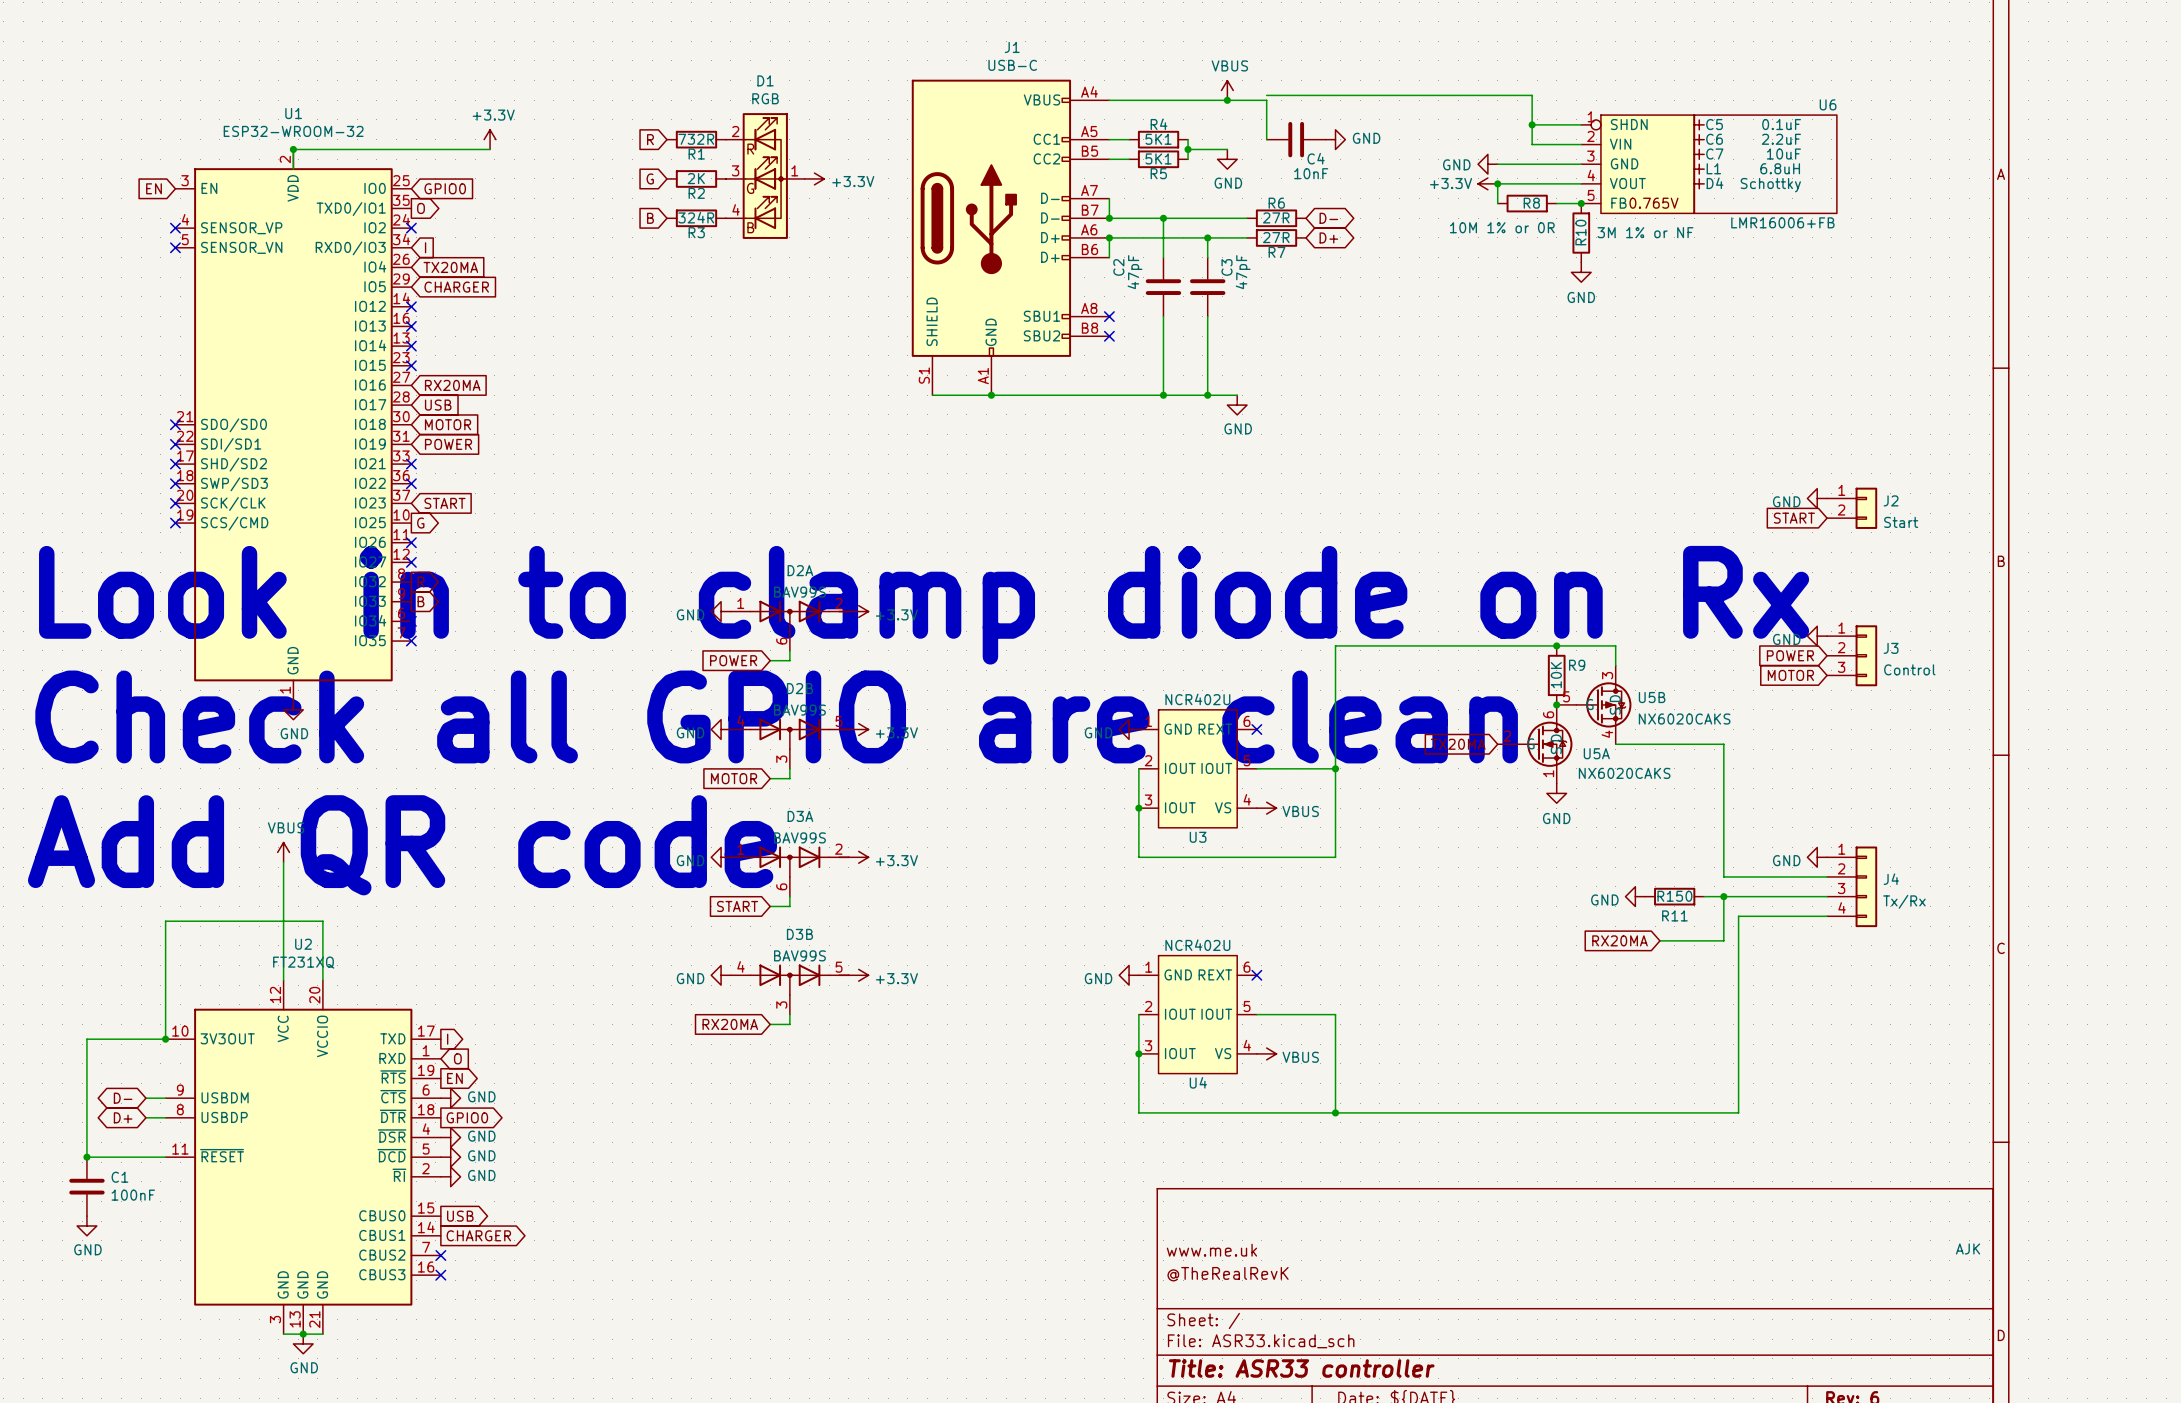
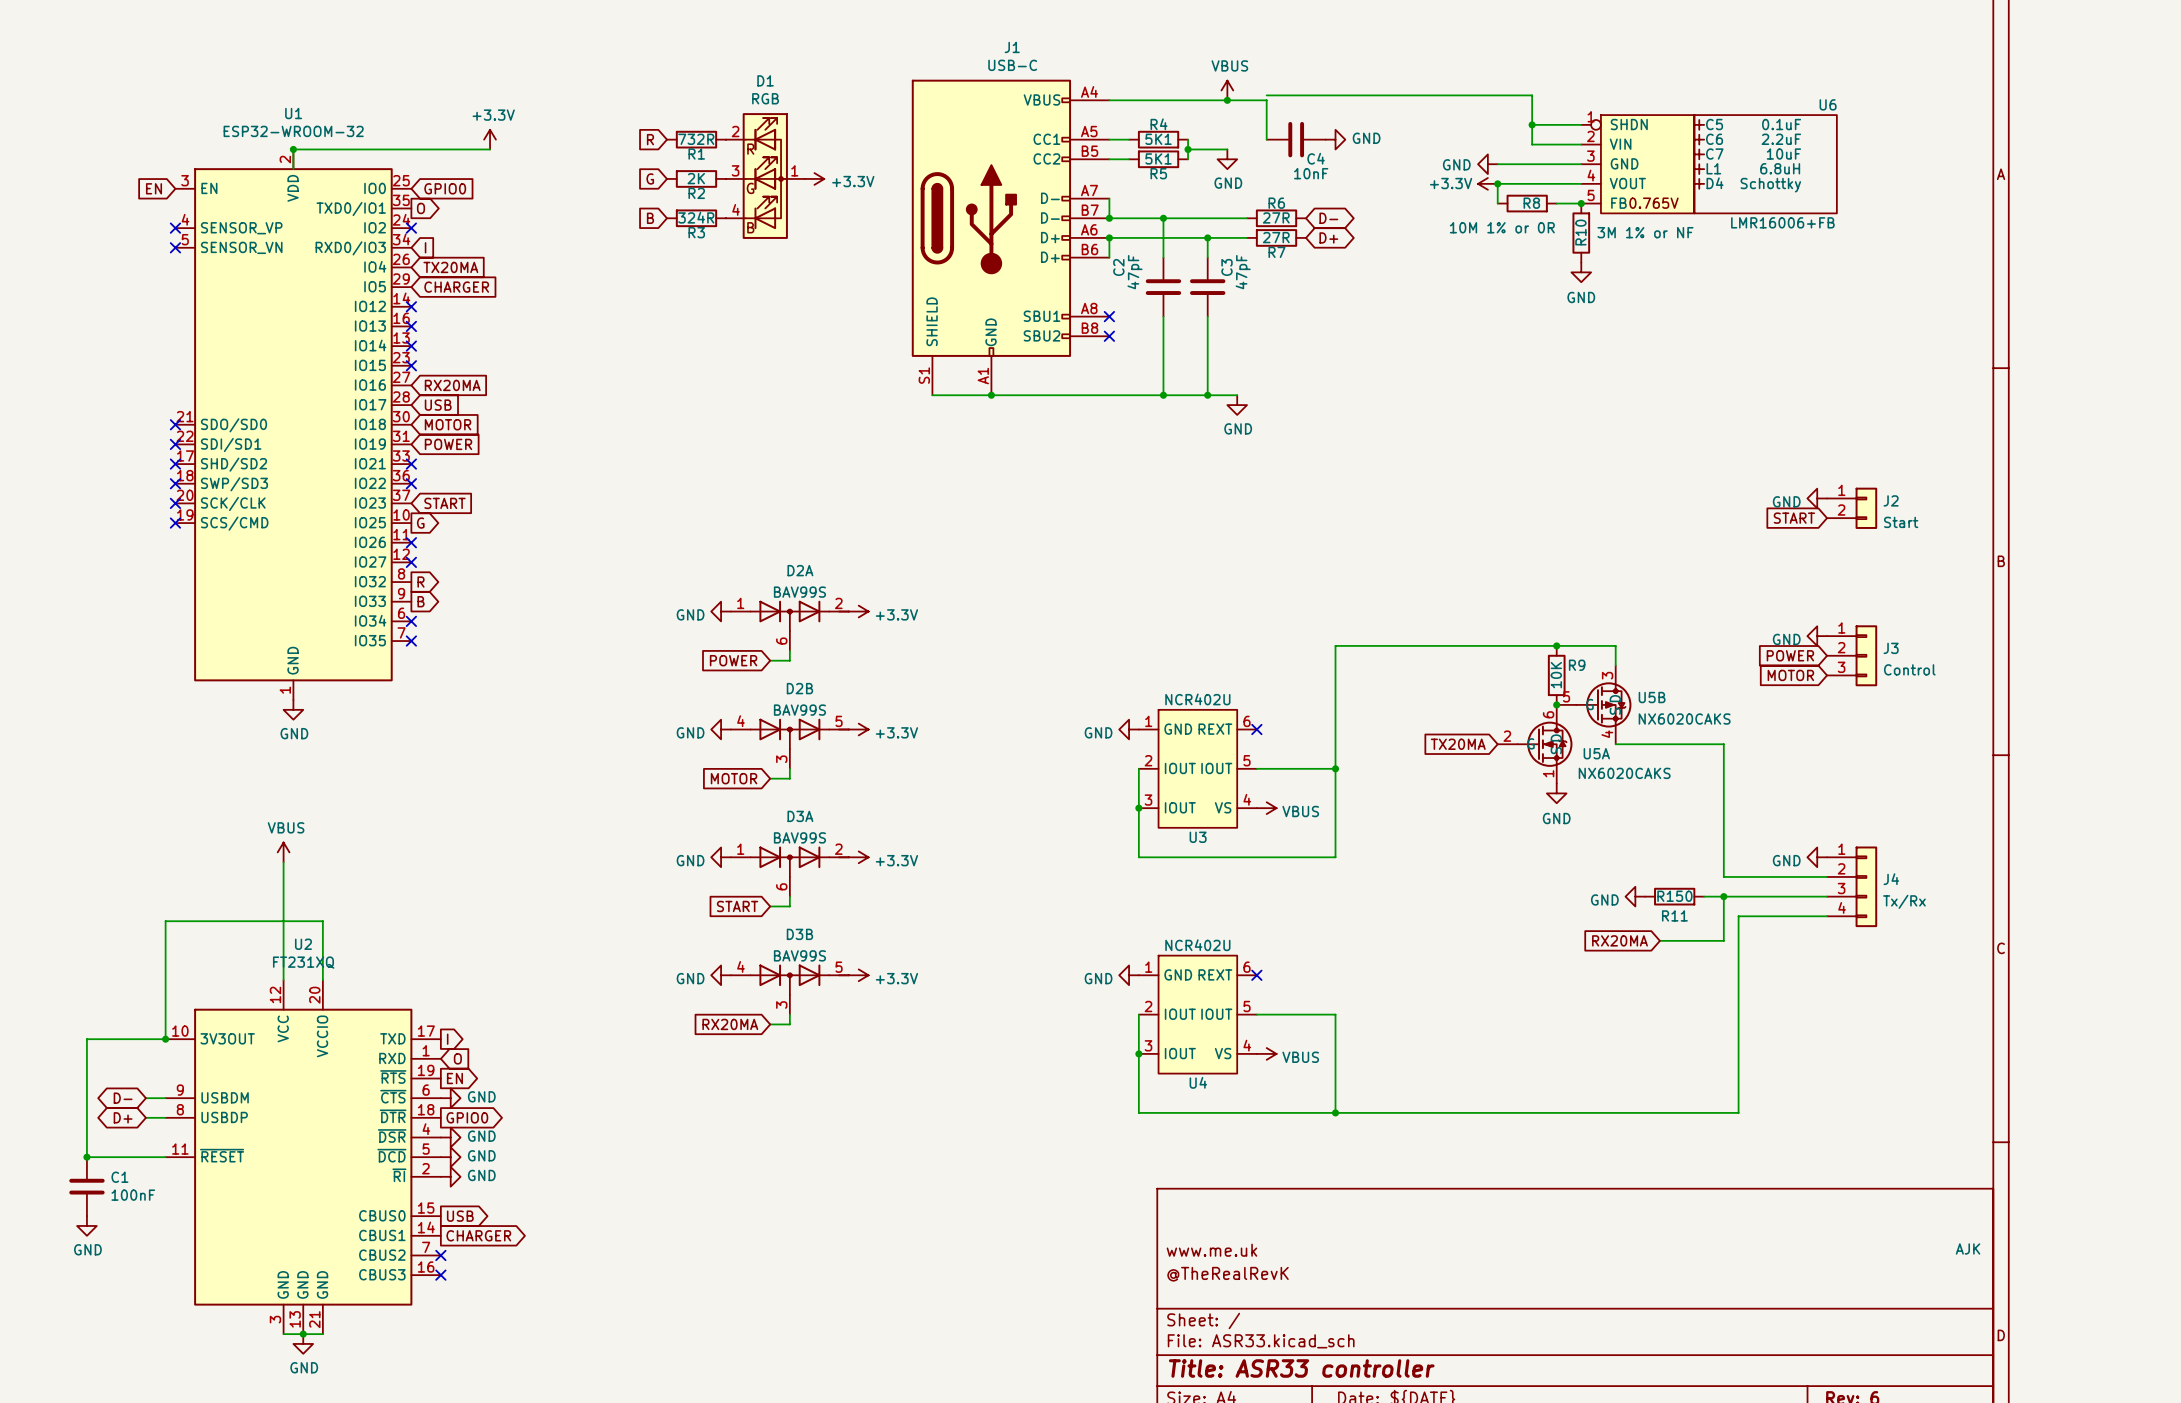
text: Look in to clamp diode on Rx (924, 605) -> none
text: Check all GPIO are clean (776, 716) -> none
text: Add QR code (402, 845) -> none

